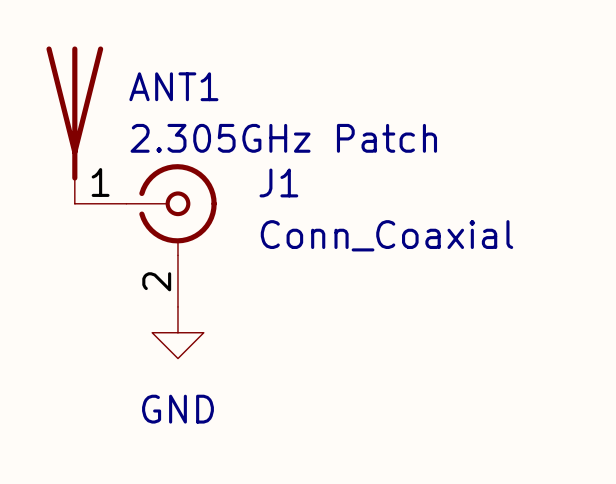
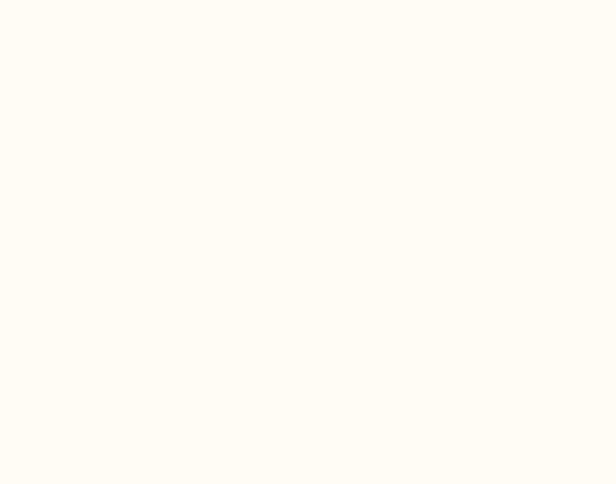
ANT1: 2.305GHz Patch (74, 125) -> none
J1: Conn_Coaxial (145, 235) -> none
power symbol: GND (177, 332) -> none

